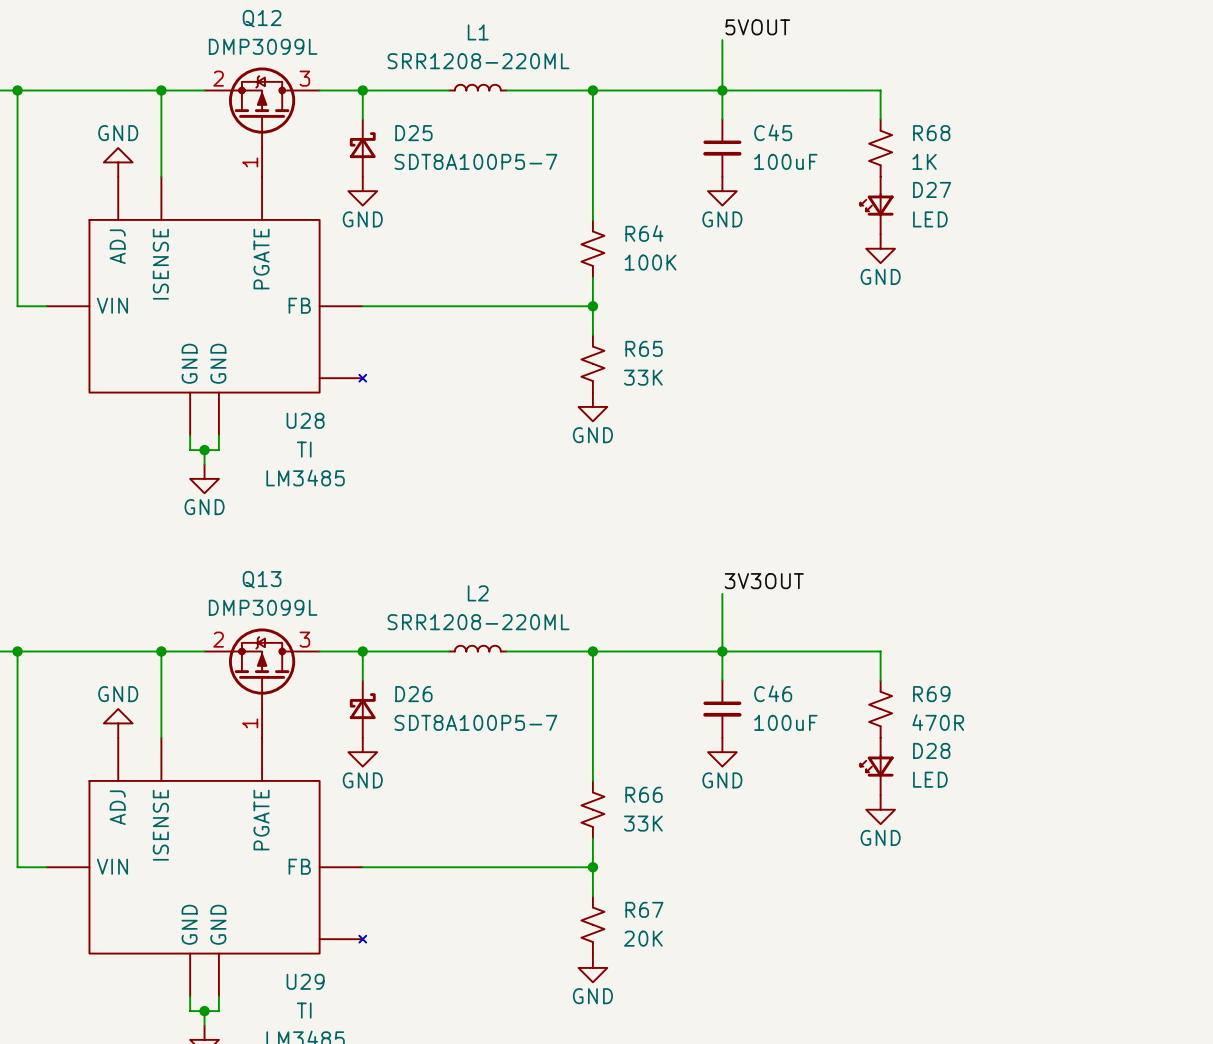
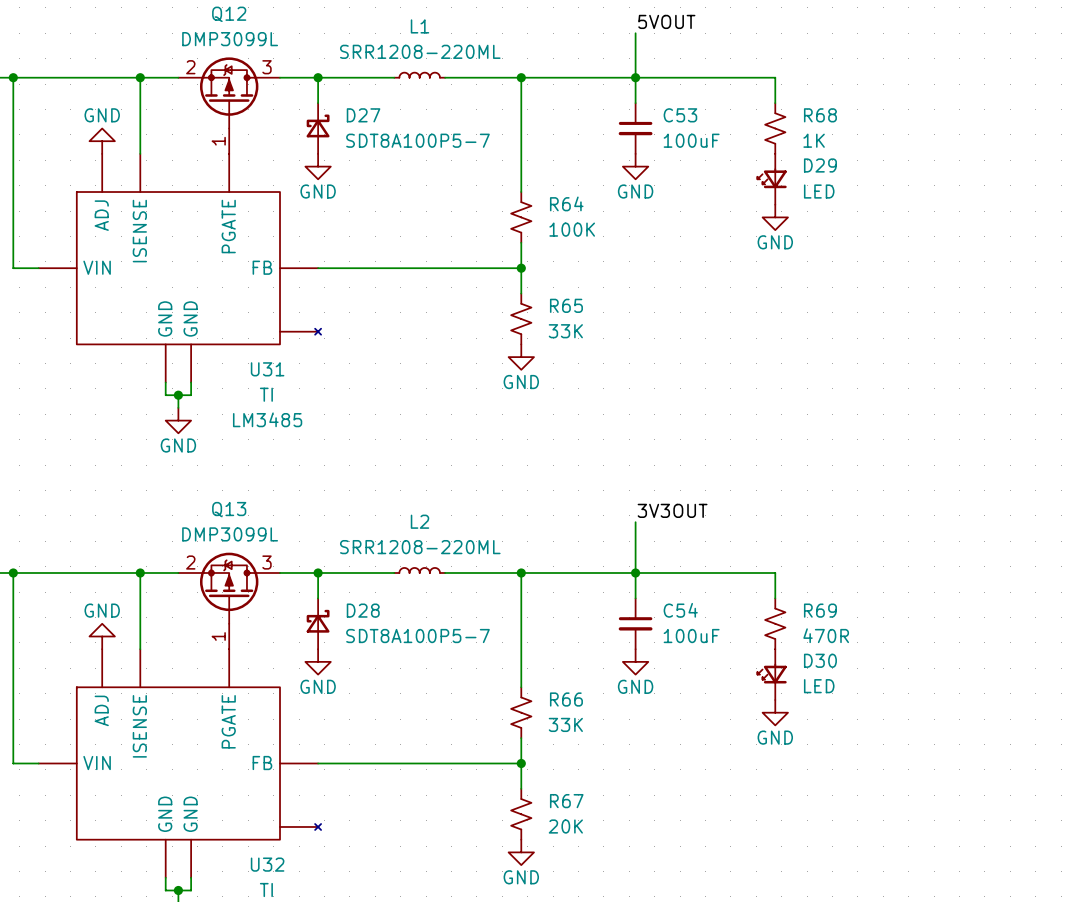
C45 name: C45 (773, 132) -> C53 (680, 115)
D25 name: D25 (413, 133) -> D27 (363, 115)
D27 name: D27 (932, 189) -> D29 (820, 165)
U28 name: U28 (305, 420) -> U31 (267, 369)
C46 name: C46 (773, 693) -> C54 (680, 610)
D26 name: D26 (413, 694) -> D28 (363, 610)
D28 name: D28 (931, 750) -> D30 (820, 660)
U29 name: U29 (305, 981) -> U32 (267, 864)

